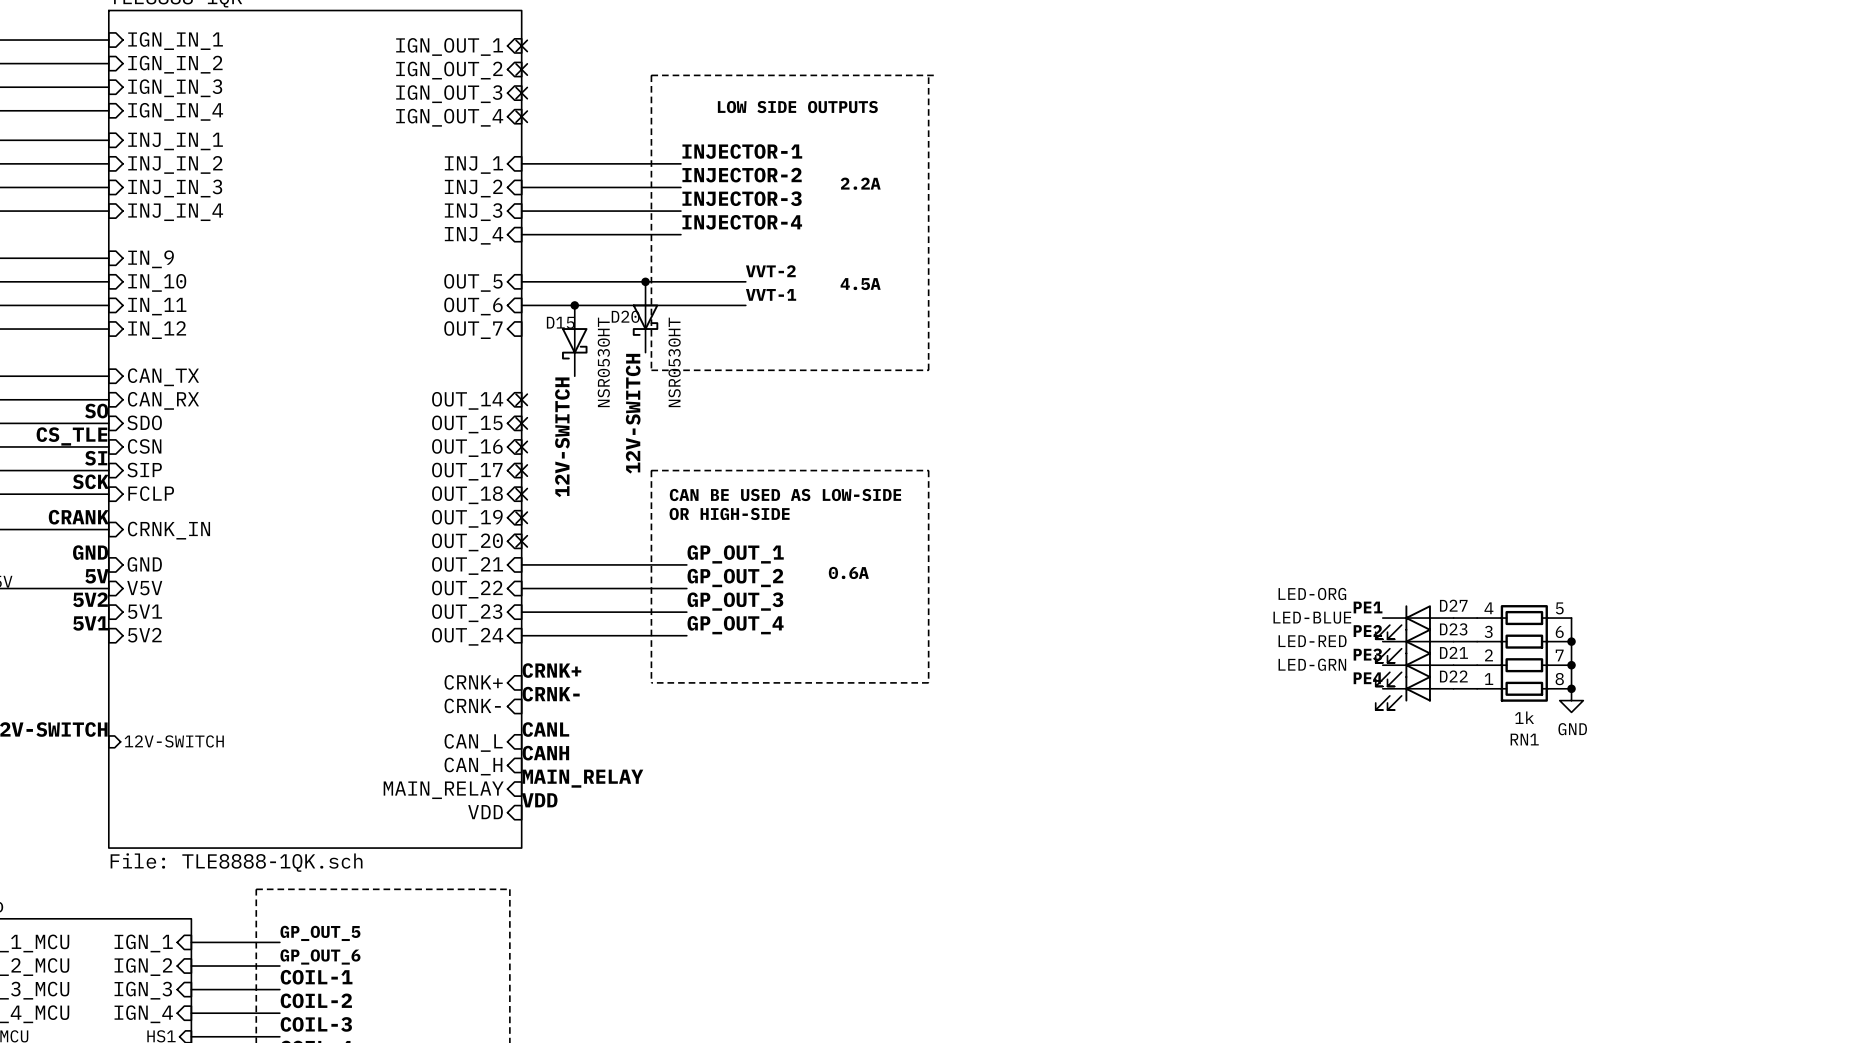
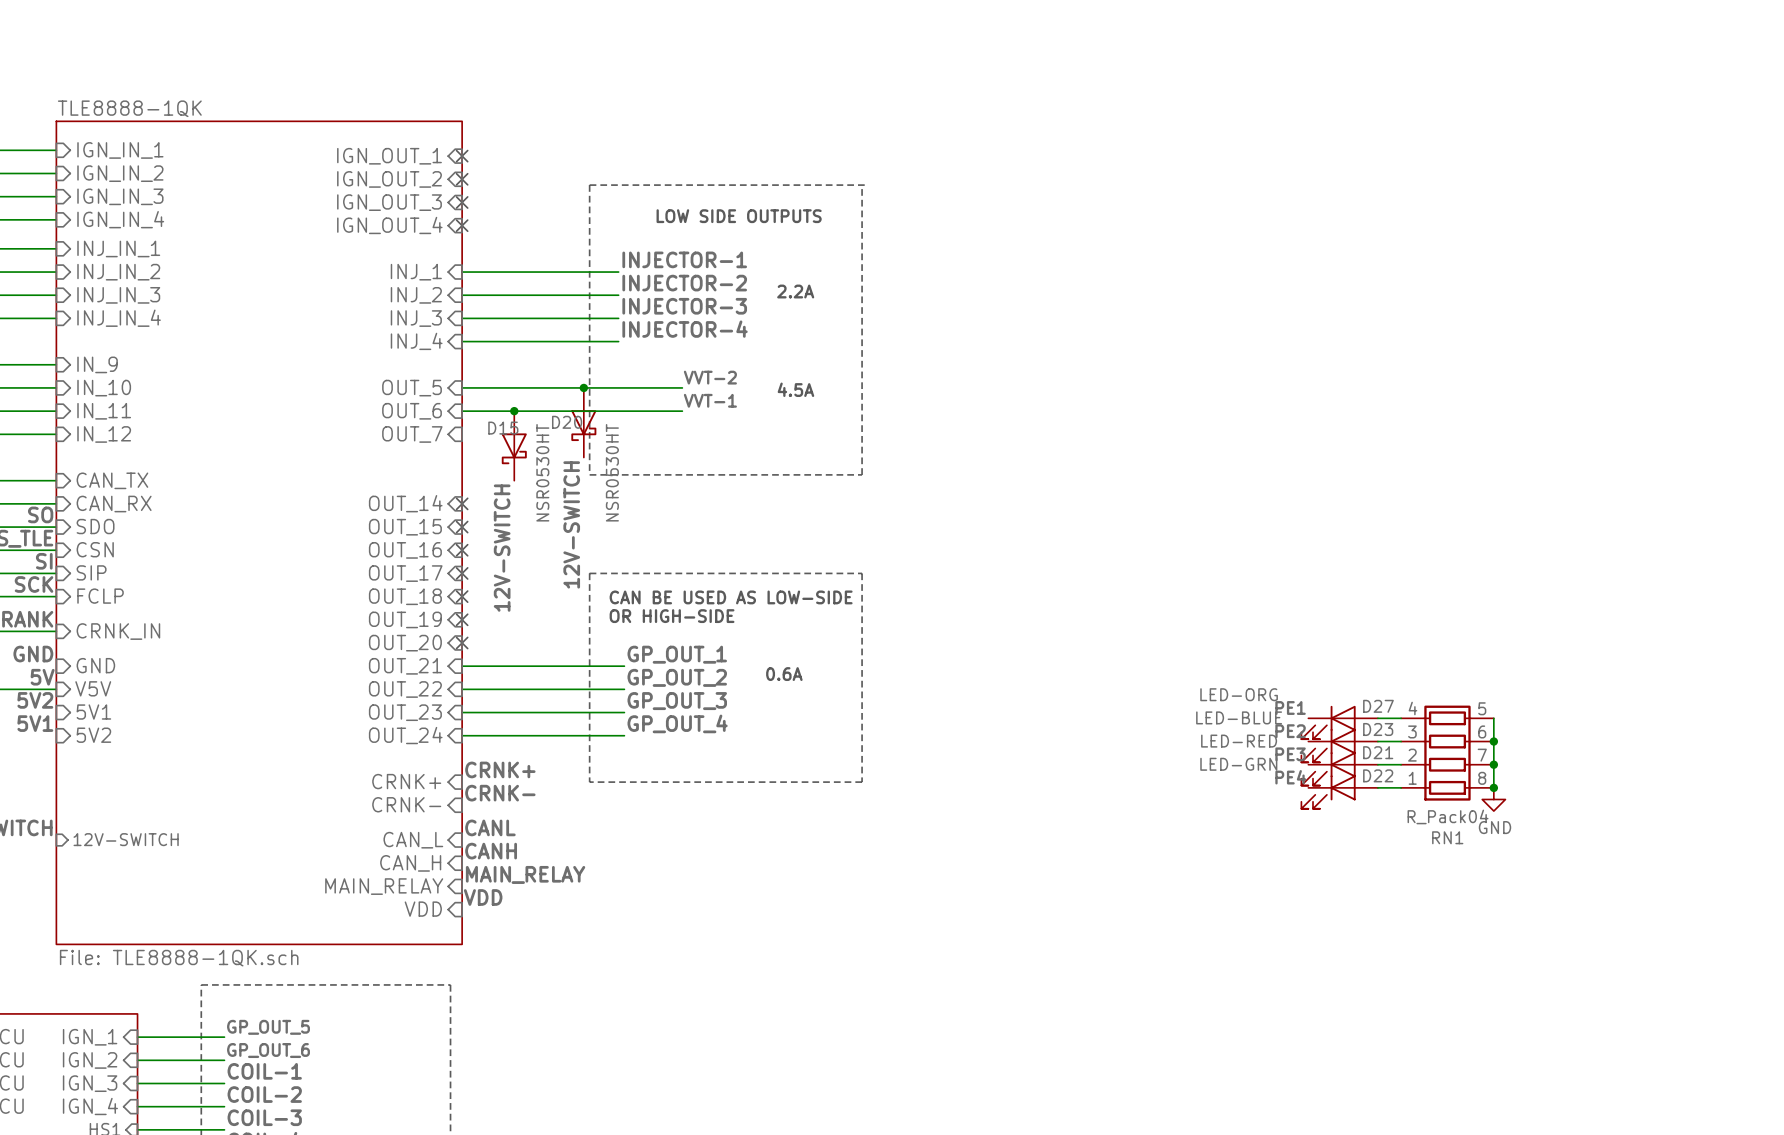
RN1 value: 1k (1524, 717) -> R_Pack04 (1448, 816)

